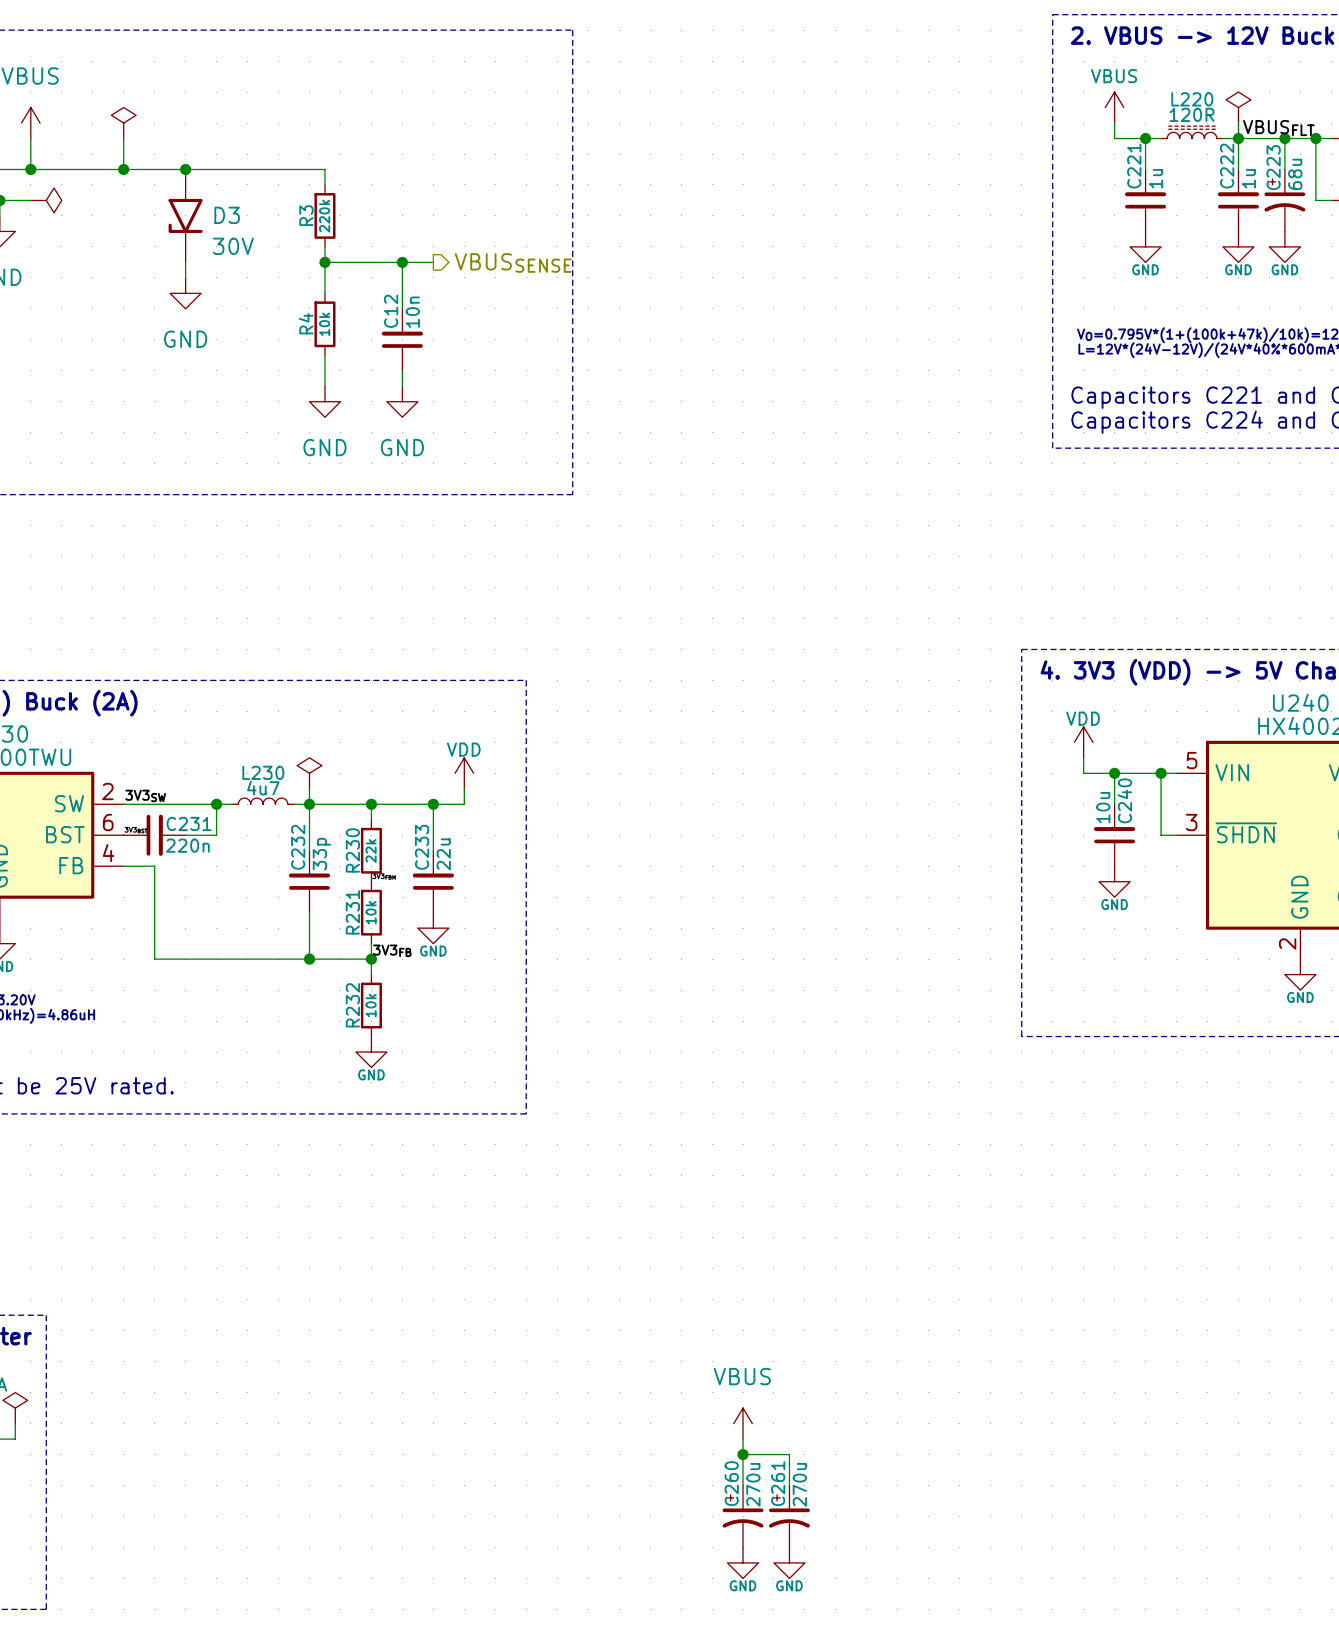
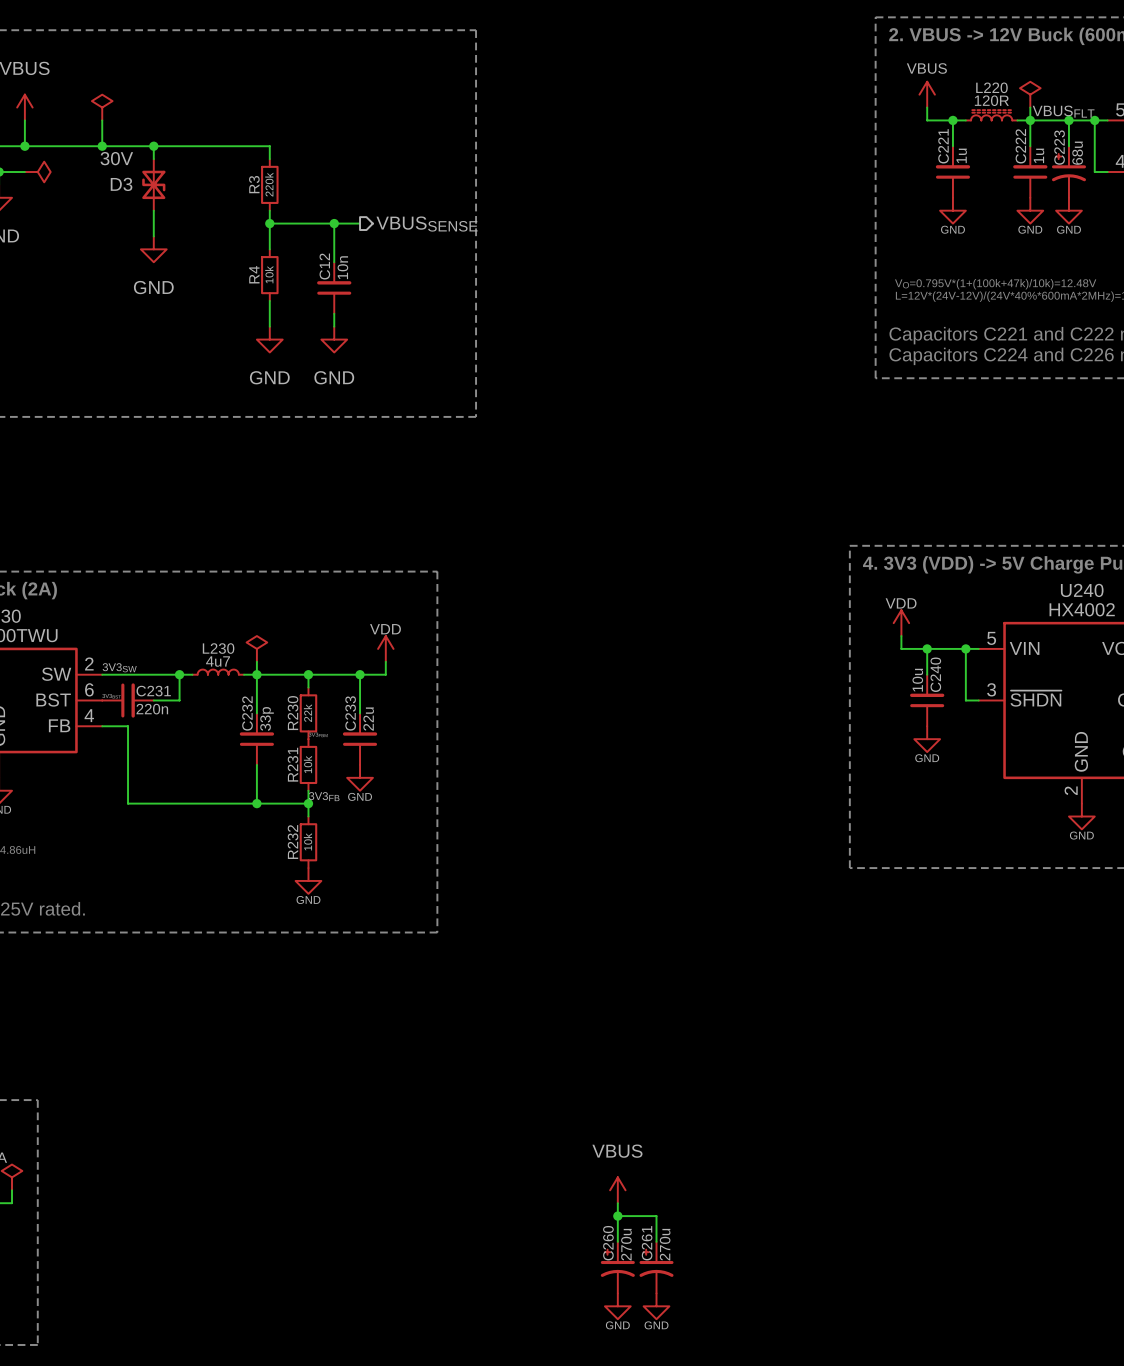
D3 symbol: [168, 169, 203, 263] -> [142, 159, 166, 211]
D3 name position: D3 (227, 215) -> D3 (121, 184)
D3 value position: 30V (233, 246) -> 30V (116, 158)

